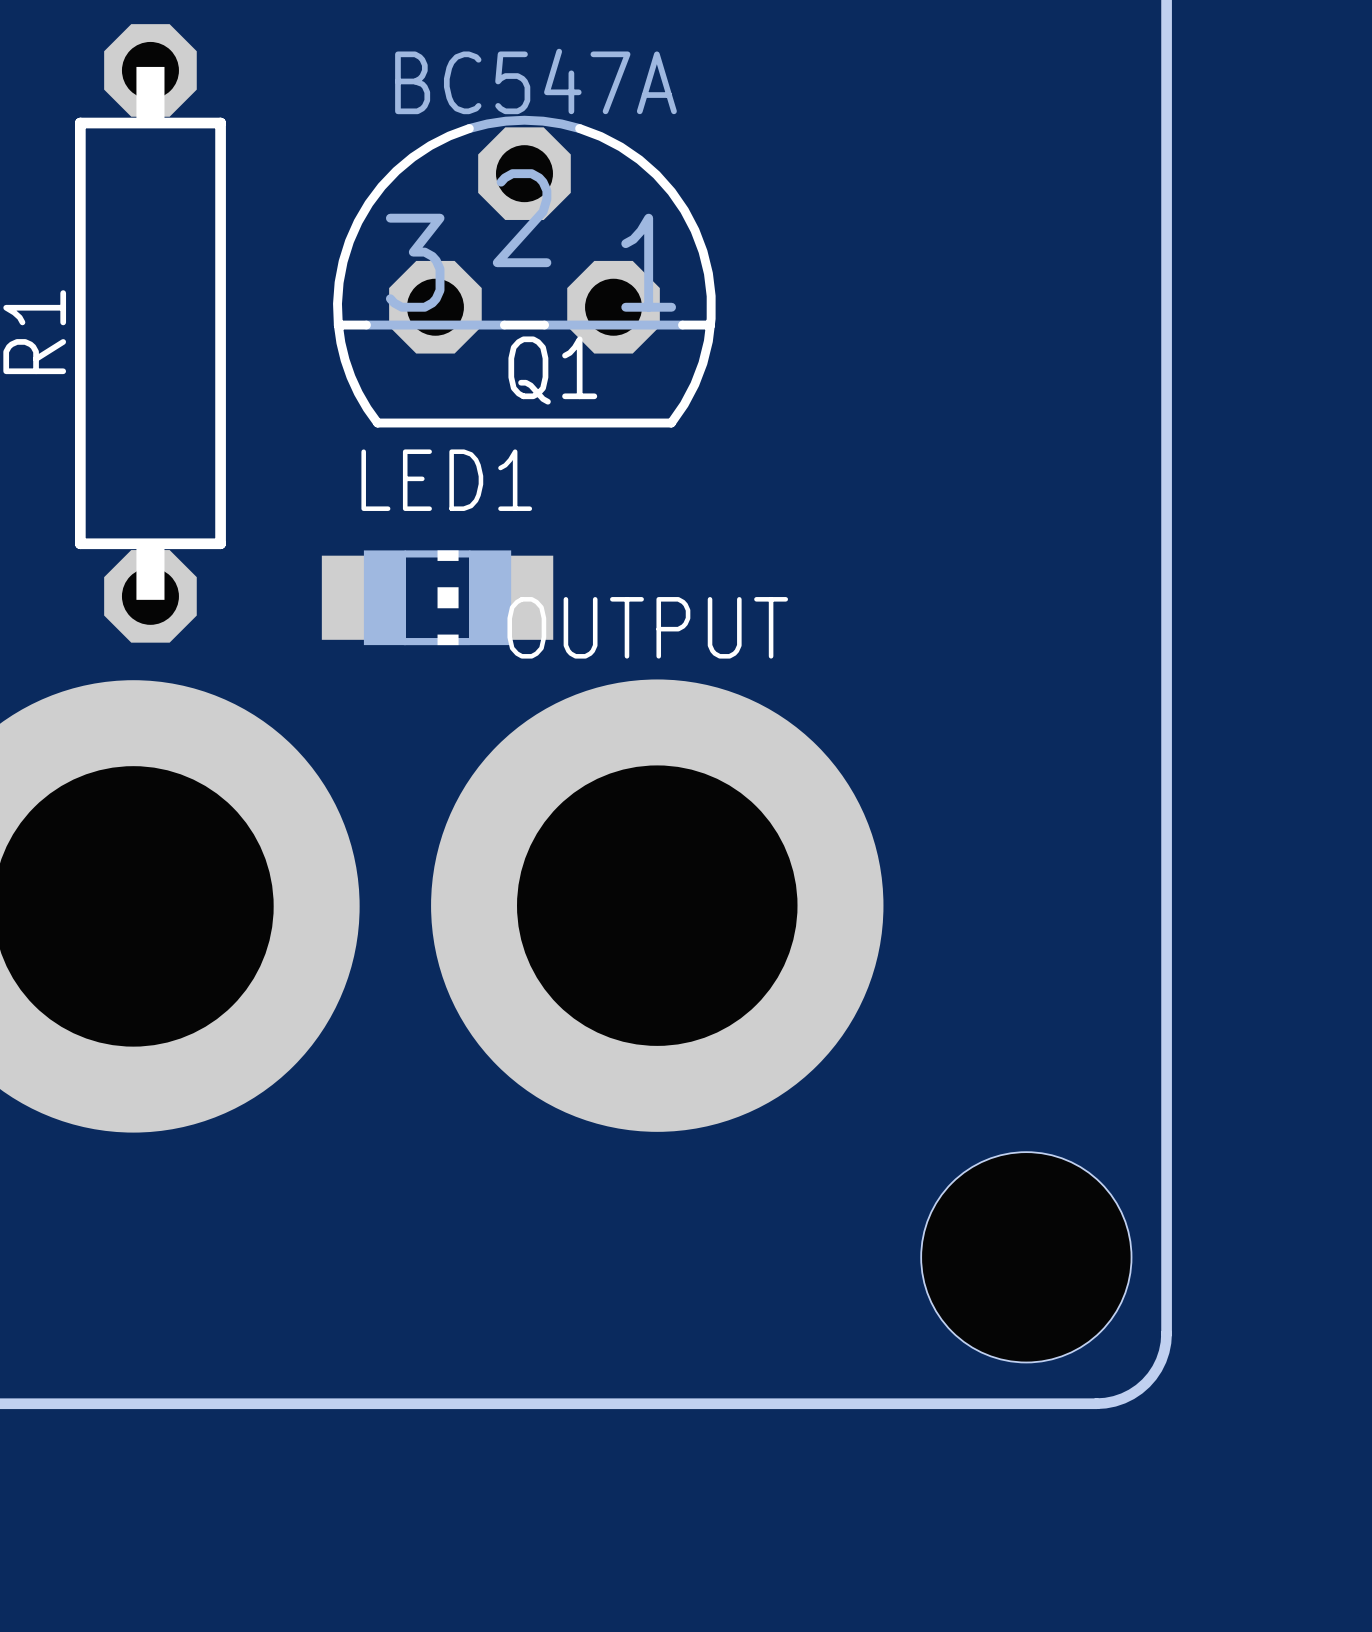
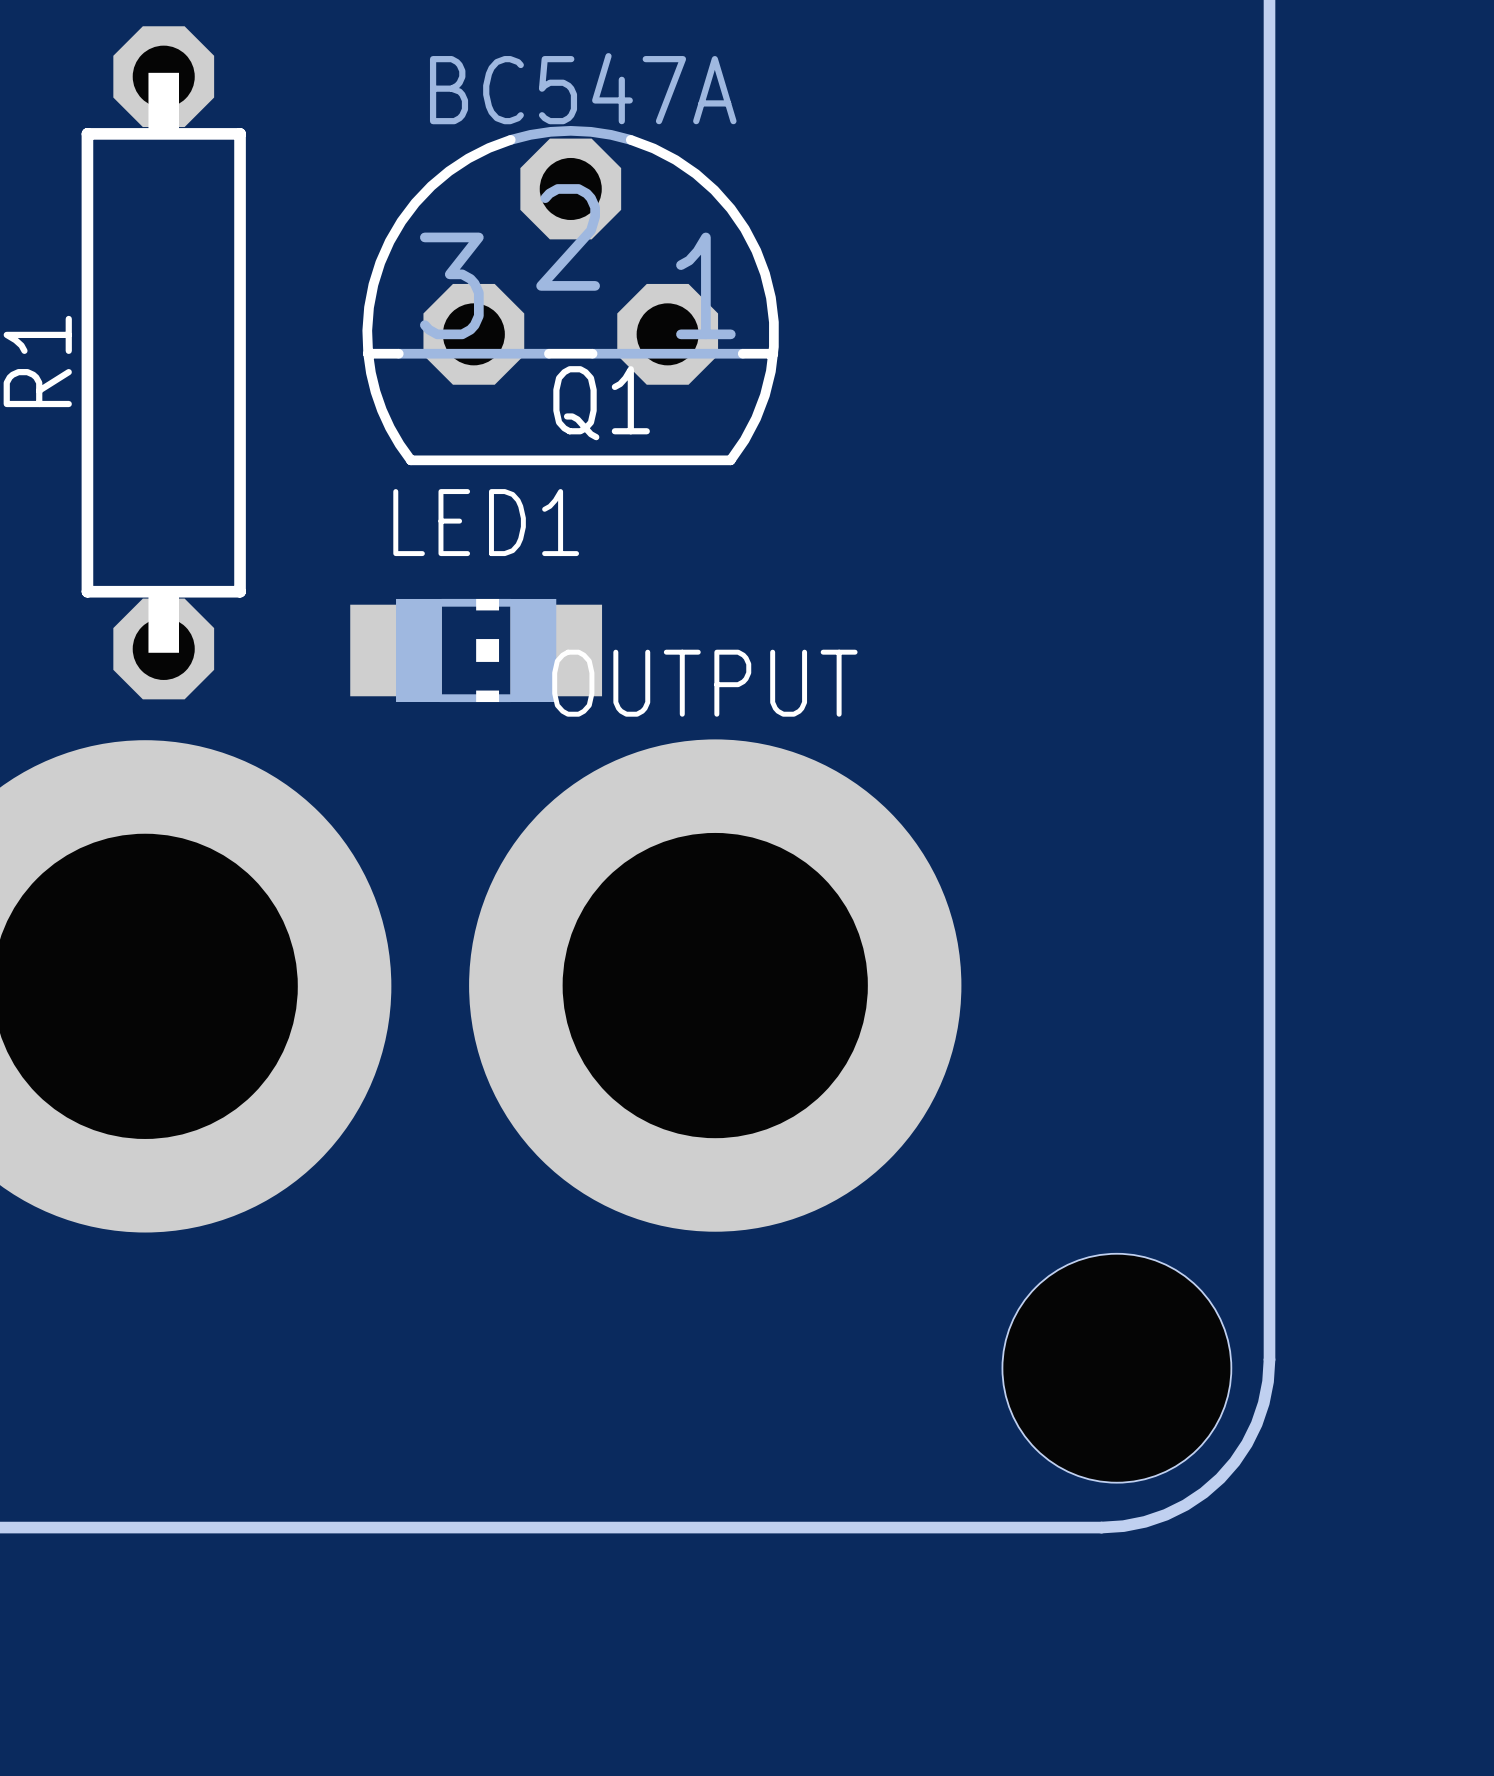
board edge: (1166, 1249) (1165, 1342) (1161, 1360) (1146, 1383) (1123, 1398) (1105, 1403) (1012, 1403) -> (1269, 1359) (1268, 1381) (1256, 1423) (1247, 1443) (1220, 1478) (1185, 1505) (1165, 1514) (1123, 1526) (1101, 1527)

